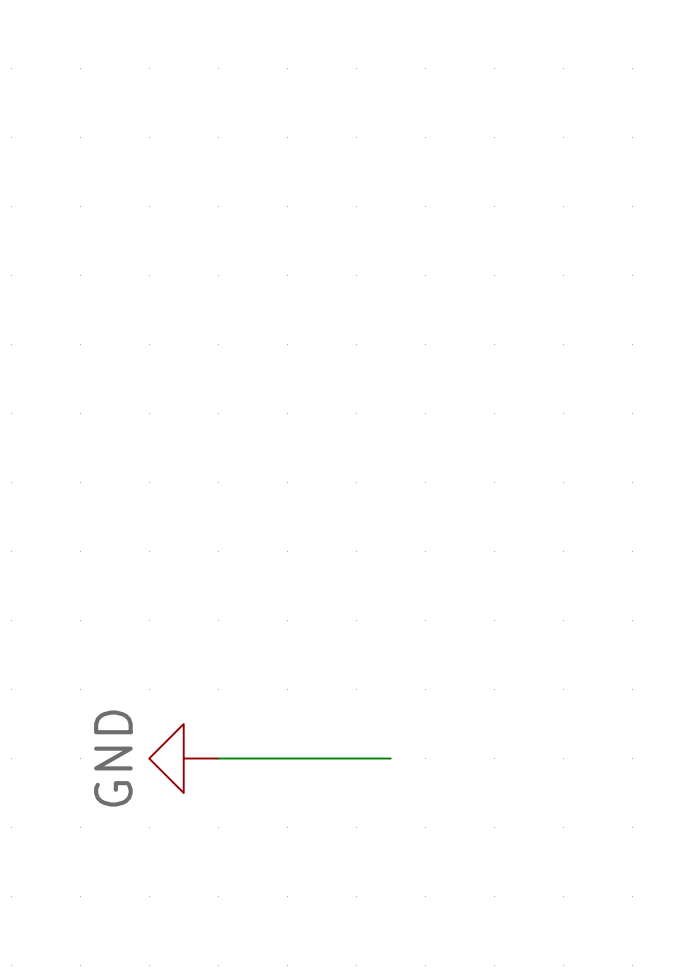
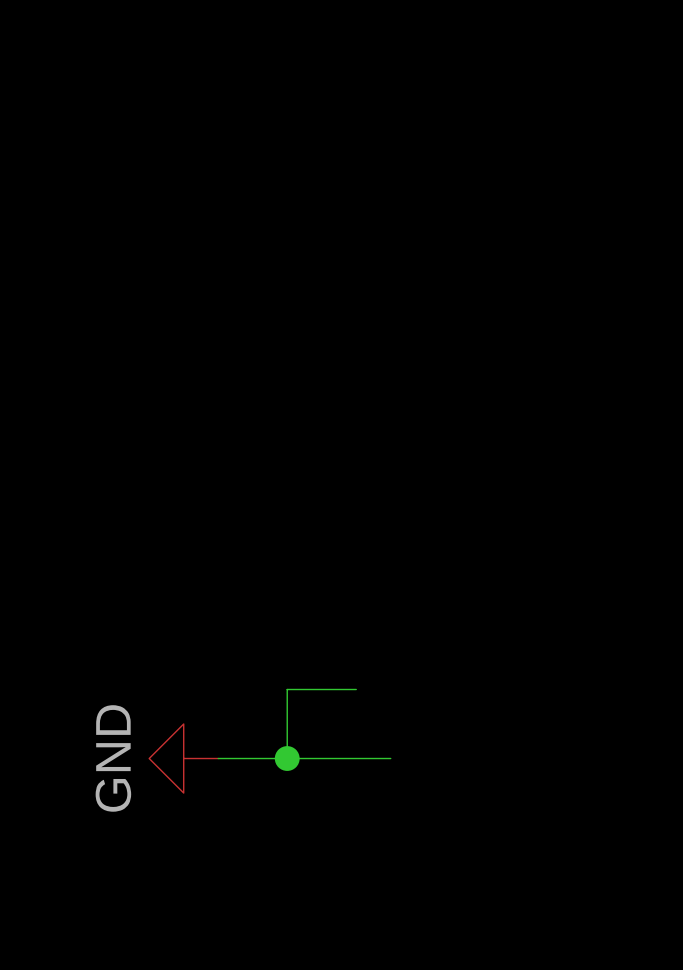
wire: none -> (356, 689) (287, 689) (287, 758)
junction: none -> (287, 758)

